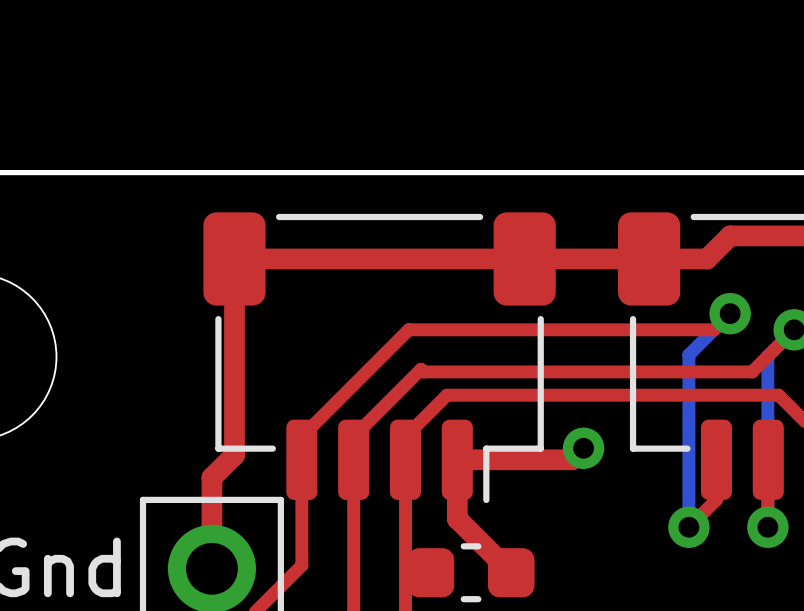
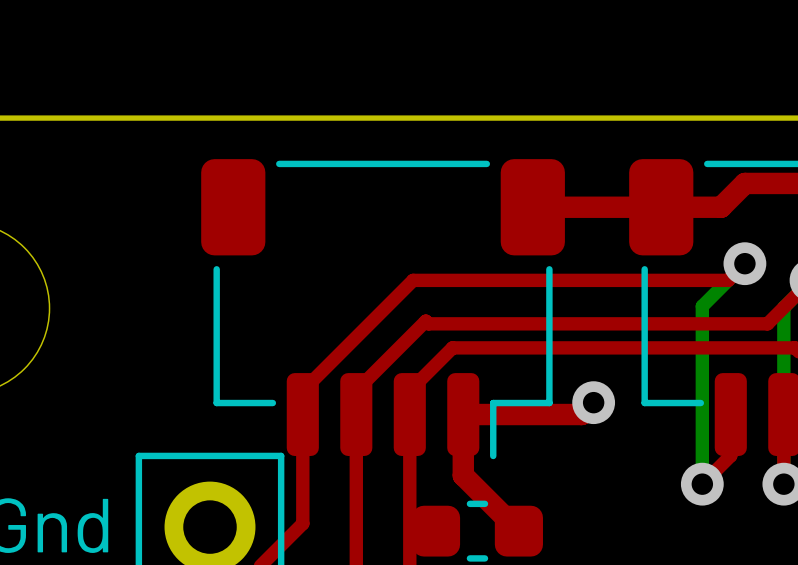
top track: (524, 258) (234, 258) (234, 455) (211, 477) (211, 568) -> none

